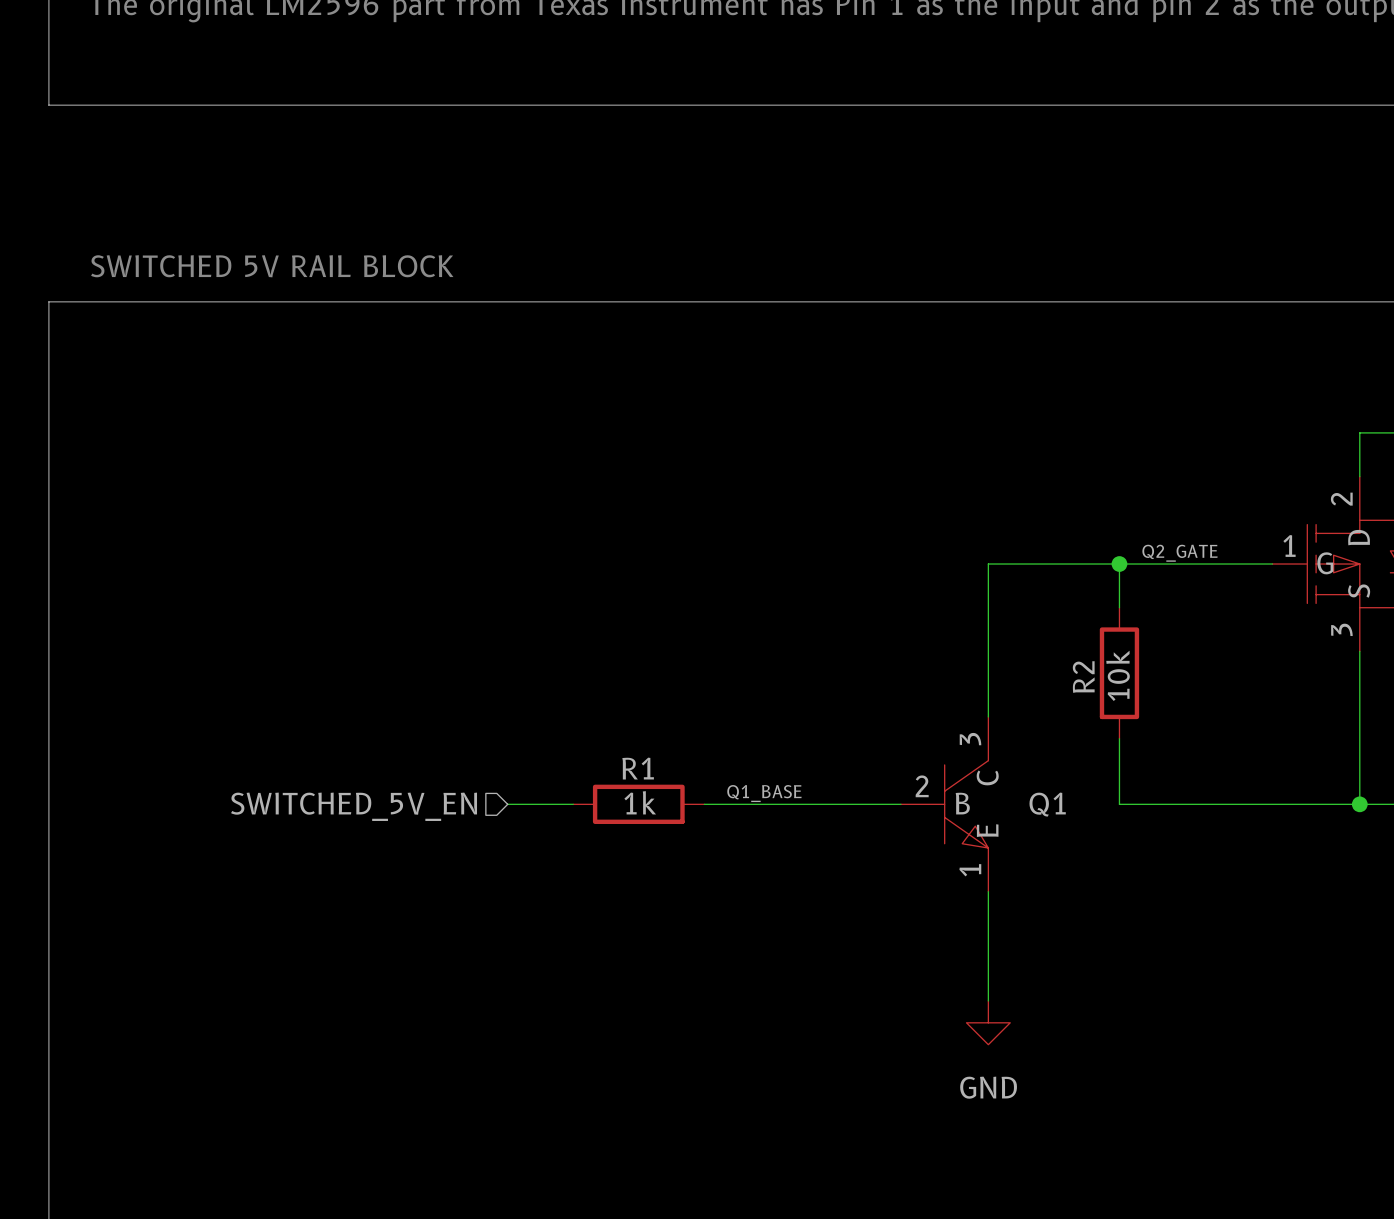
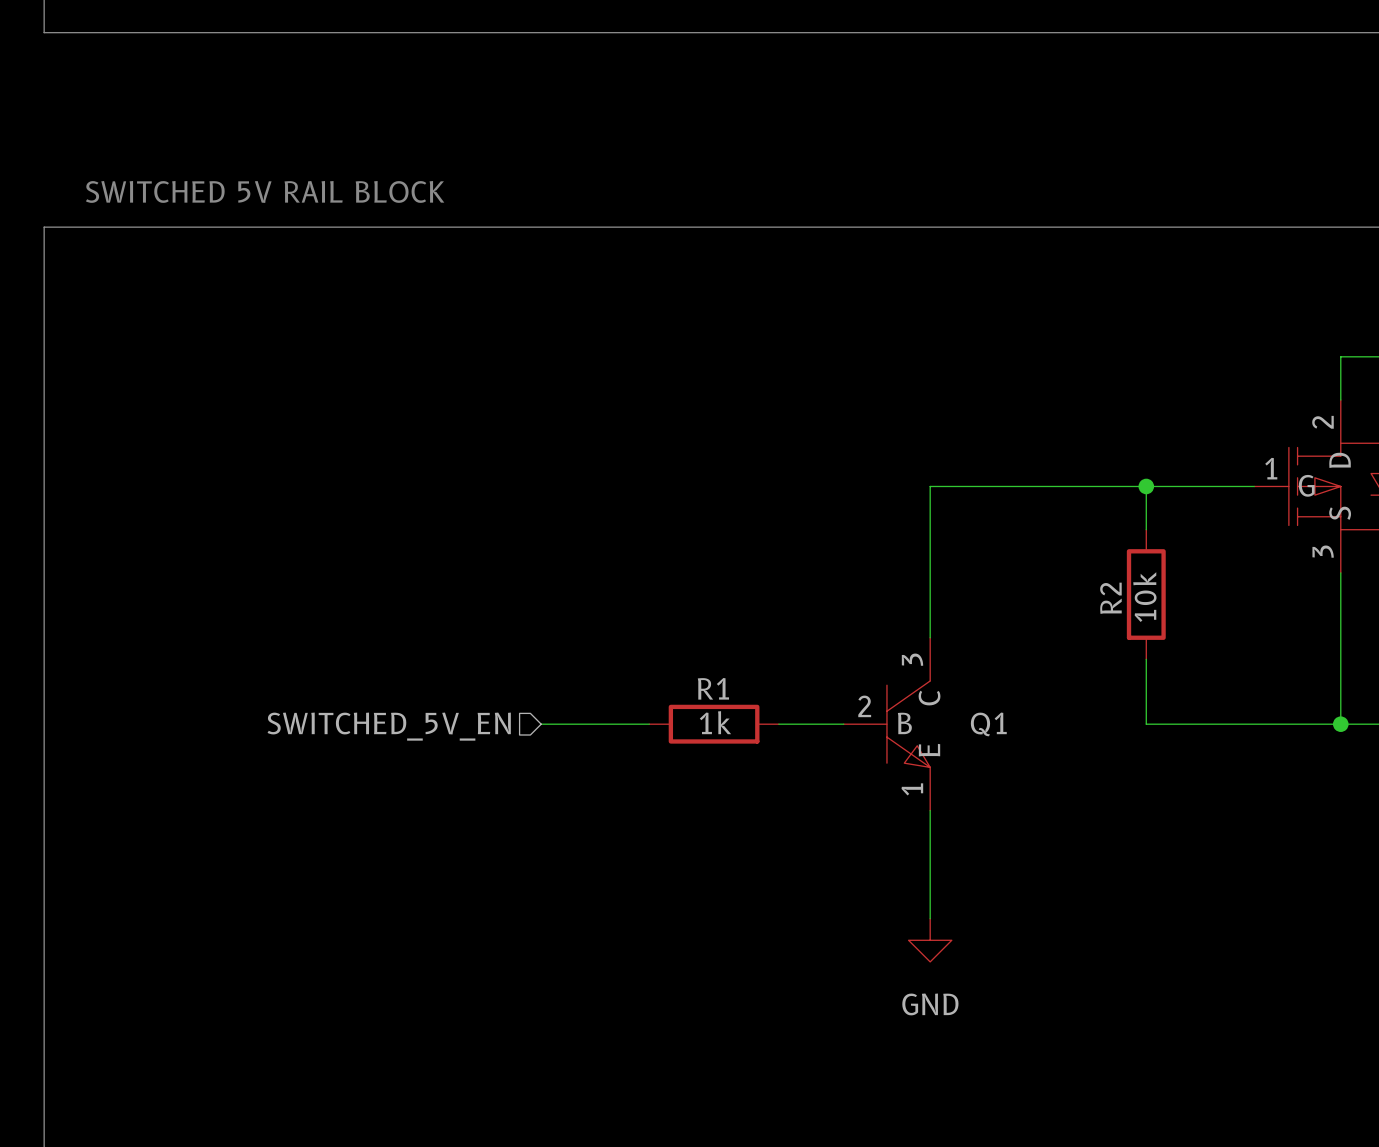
label: Q2_GATE (1179, 553) -> none
wire: (988, 564) (988, 716) -> (973, 486) (930, 486) (930, 637)
wire: (1119, 564) (1119, 607) -> (1146, 486) (1146, 529)
junction position: (1119, 564) -> (1146, 486)
R2 position: (1119, 673) -> (1146, 594)
wire: (1119, 738) (1119, 804) (1163, 804) -> (1146, 659) (1146, 724)
label: Q1_BASE (764, 793) -> none
wire: (507, 804) (551, 804) -> none
R1 position: (638, 804) -> (714, 724)
wire: (704, 804) (791, 804) -> (562, 724) (649, 724)
Q1 position: (944, 804) -> (886, 724)
hierarchical label position: SWITCHED_5V_EN (354, 806) -> SWITCHED_5V_EN (389, 726)
wire: (988, 891) (988, 1000) -> (930, 810) (930, 918)
power symbol position: GND (988, 1022) -> GND (930, 940)

